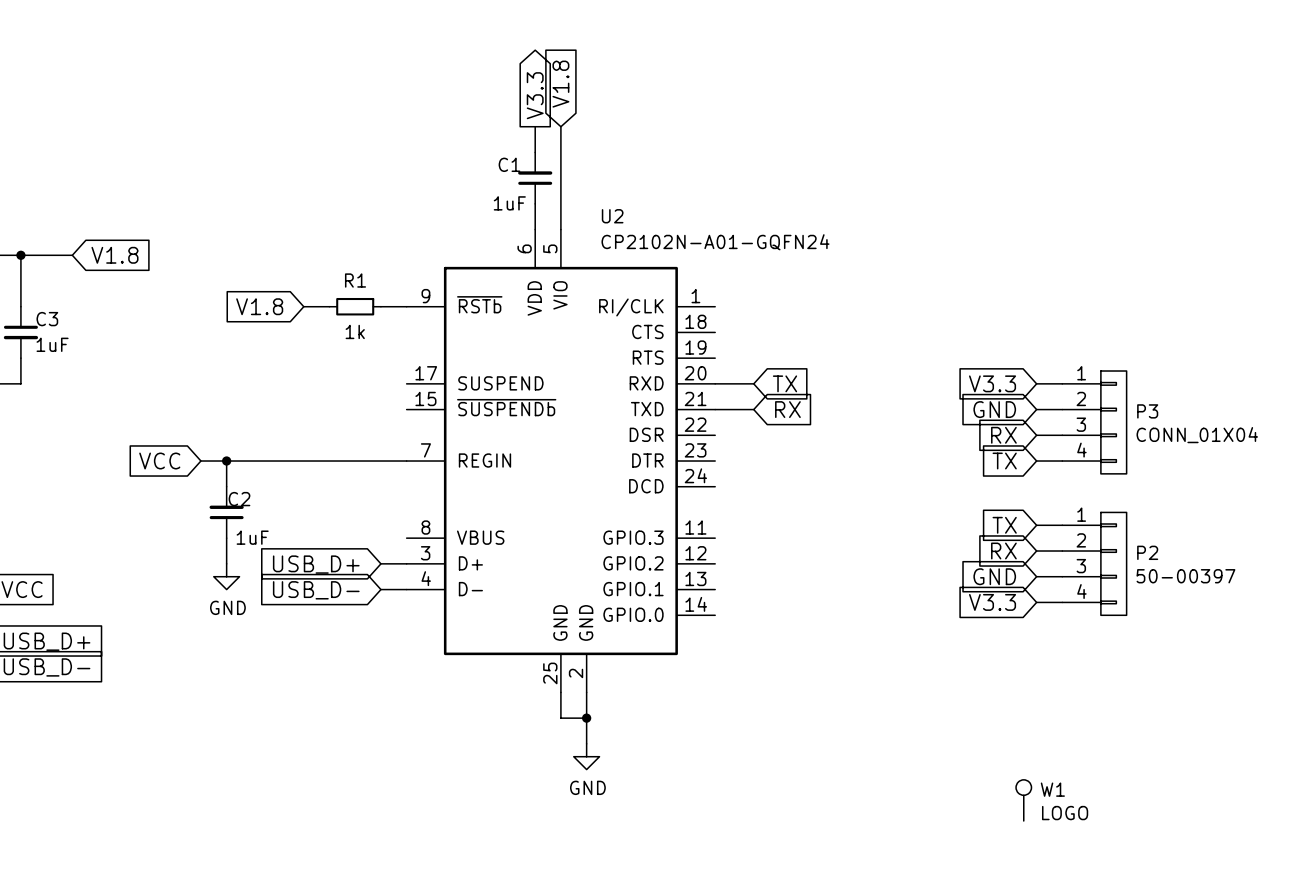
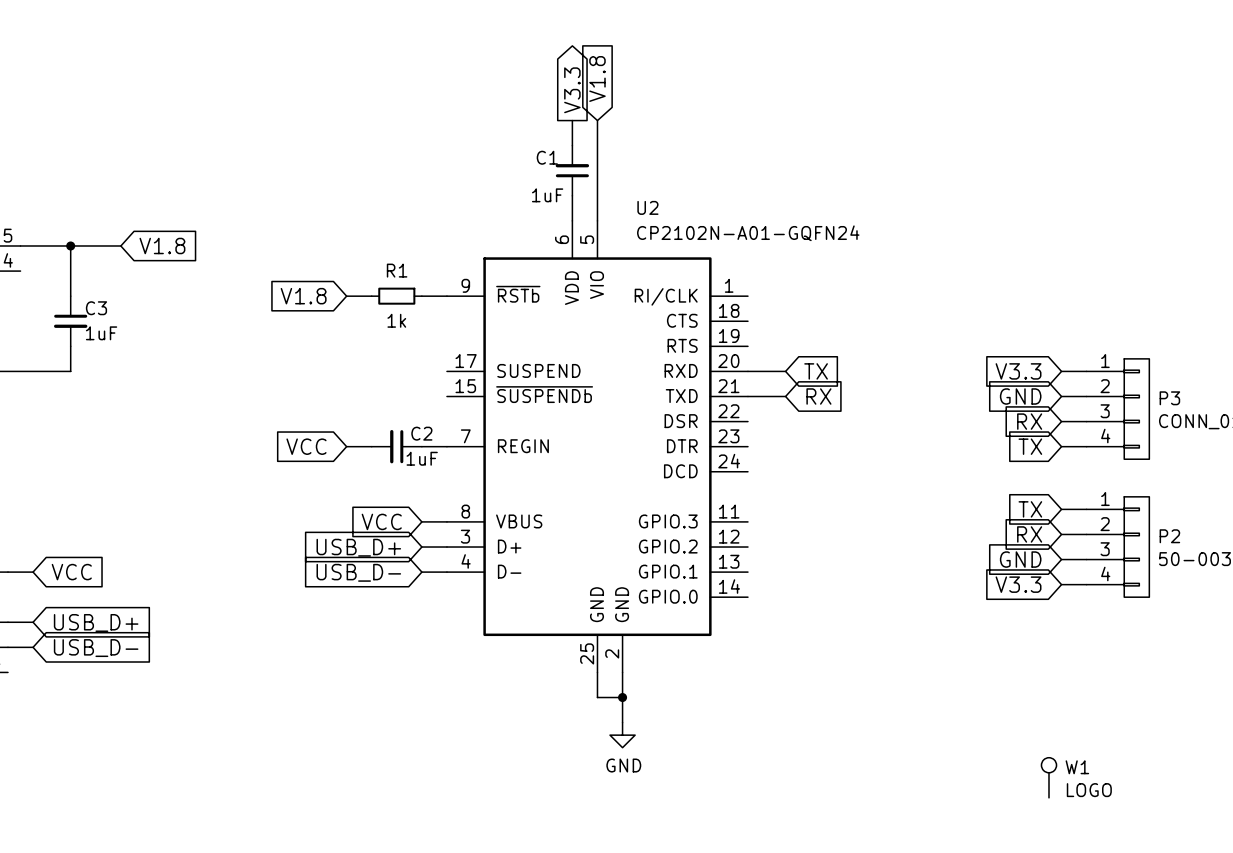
global label: VCC (159, 461) -> none
wire: (200, 461) (303, 461) -> none
wire: (226, 461) (226, 486) -> none
junction: (226, 461) -> none
global label: none -> VCC (306, 446)
C2 rotation: 0° (226, 512) -> 90° counterclockwise (396, 446)
C2 position: (226, 512) -> (396, 446)
wire: (226, 538) (226, 563) -> none
global label: none -> VCC (381, 521)
wire: none -> (421, 521) (446, 521)
power symbol: GND (226, 576) -> none

